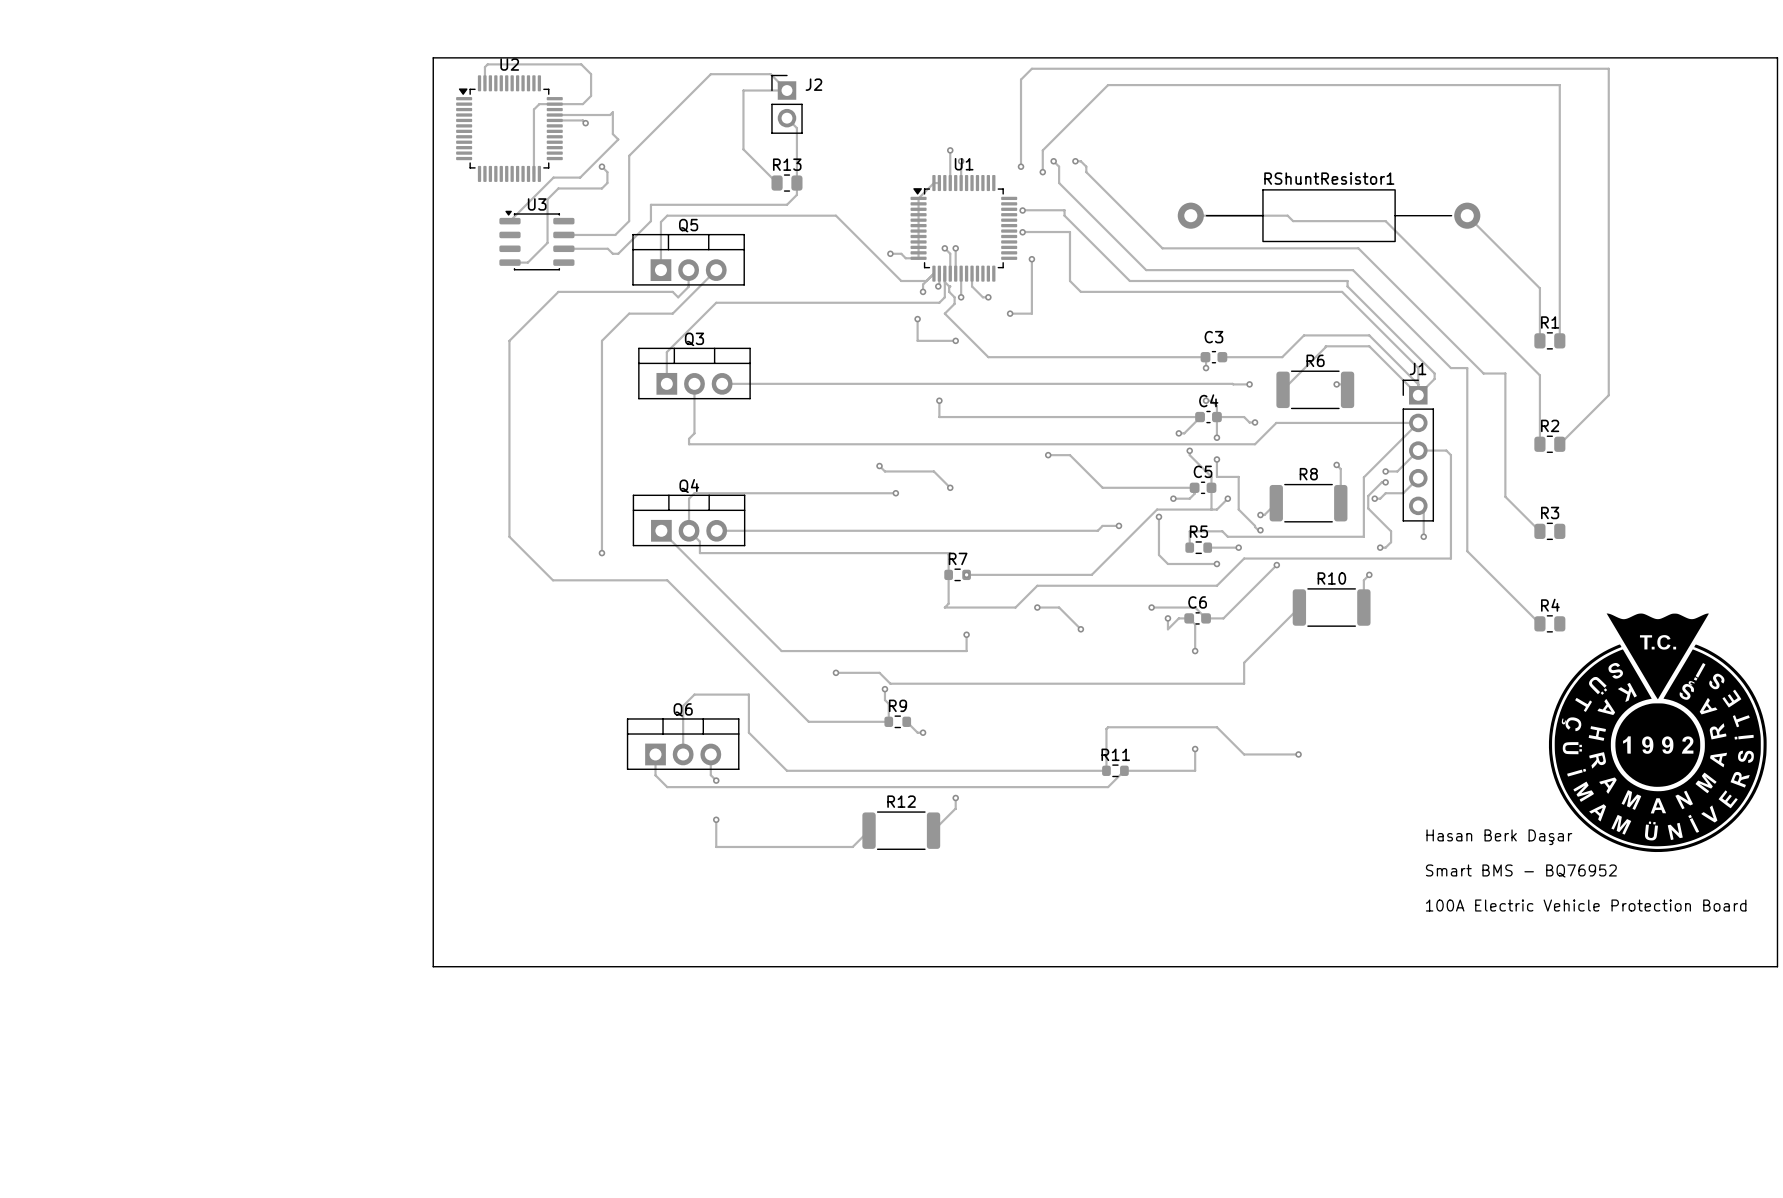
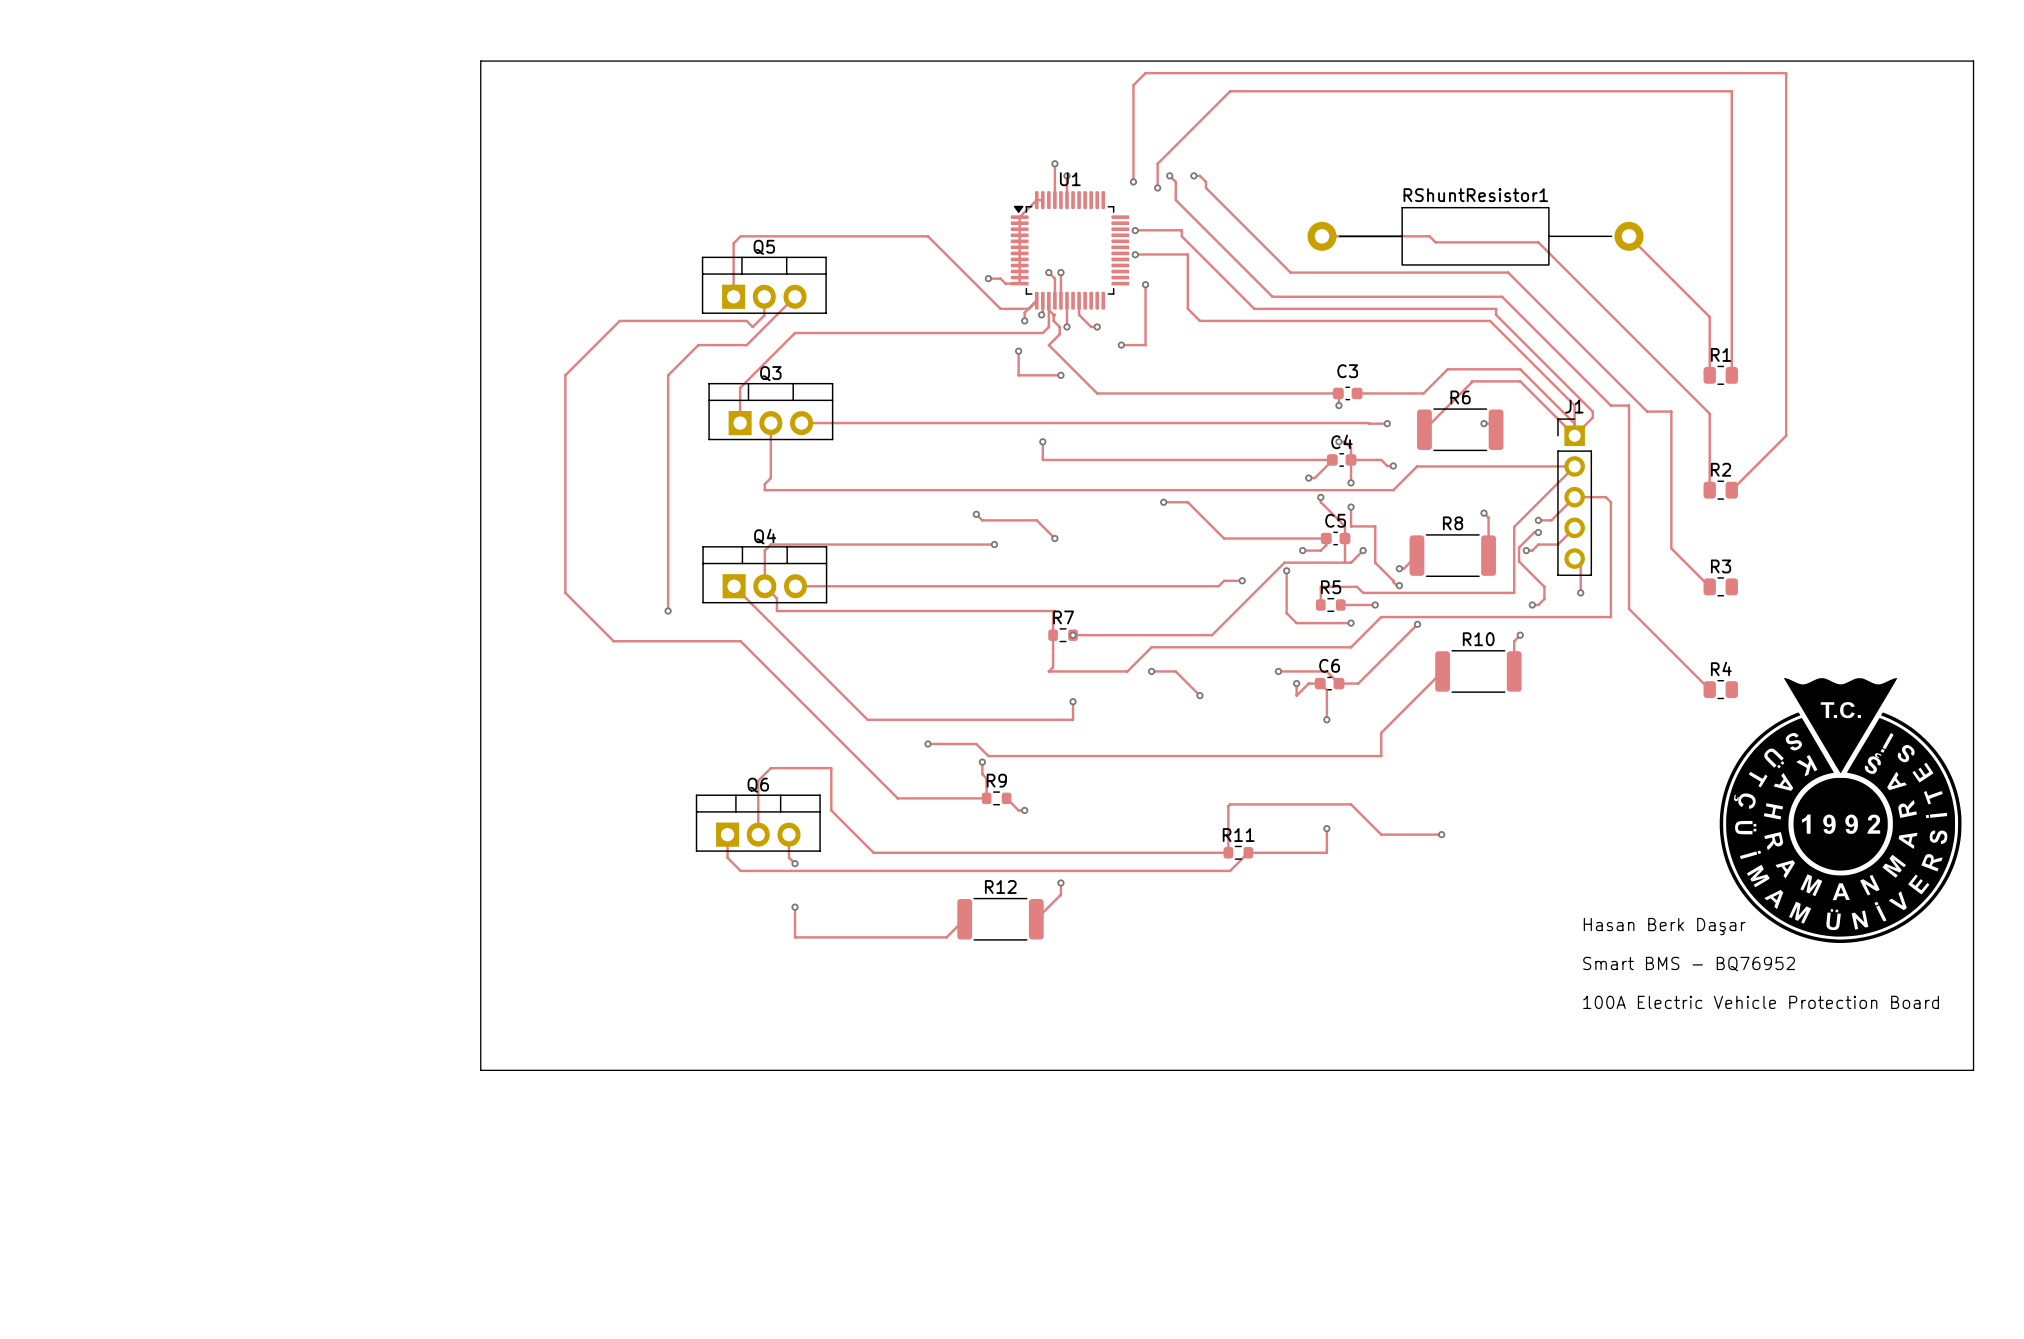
track: (484, 83) (484, 67) (487, 64) (581, 64) (591, 74) (591, 95) (582, 104) (539, 104) (533, 109) (533, 173) -> none
J2: (787, 104) -> none
track: (554, 115) (610, 115) (612, 112) (612, 134) (618, 139) (580, 177) (553, 177) (509, 221) -> none
track: (787, 118) (796, 128) (796, 194) (787, 204) (650, 204) (650, 221) (618, 253) (612, 253) (607, 248) (563, 248) -> none
track: (554, 120) (582, 120) (585, 123) -> none
via: (585, 123) -> none
U2: (509, 128) -> none
track: (601, 166) (607, 172) (607, 183) (601, 188) (558, 188) (547, 199) (547, 242) (527, 262) (509, 262) -> none
via: (601, 166) -> none
track: (777, 183) (743, 149) (743, 90) (787, 90) (770, 74) (710, 74) (629, 155) (629, 221) (615, 234) (563, 234) -> none
R13: (787, 183) -> none
U3: (536, 240) -> none

